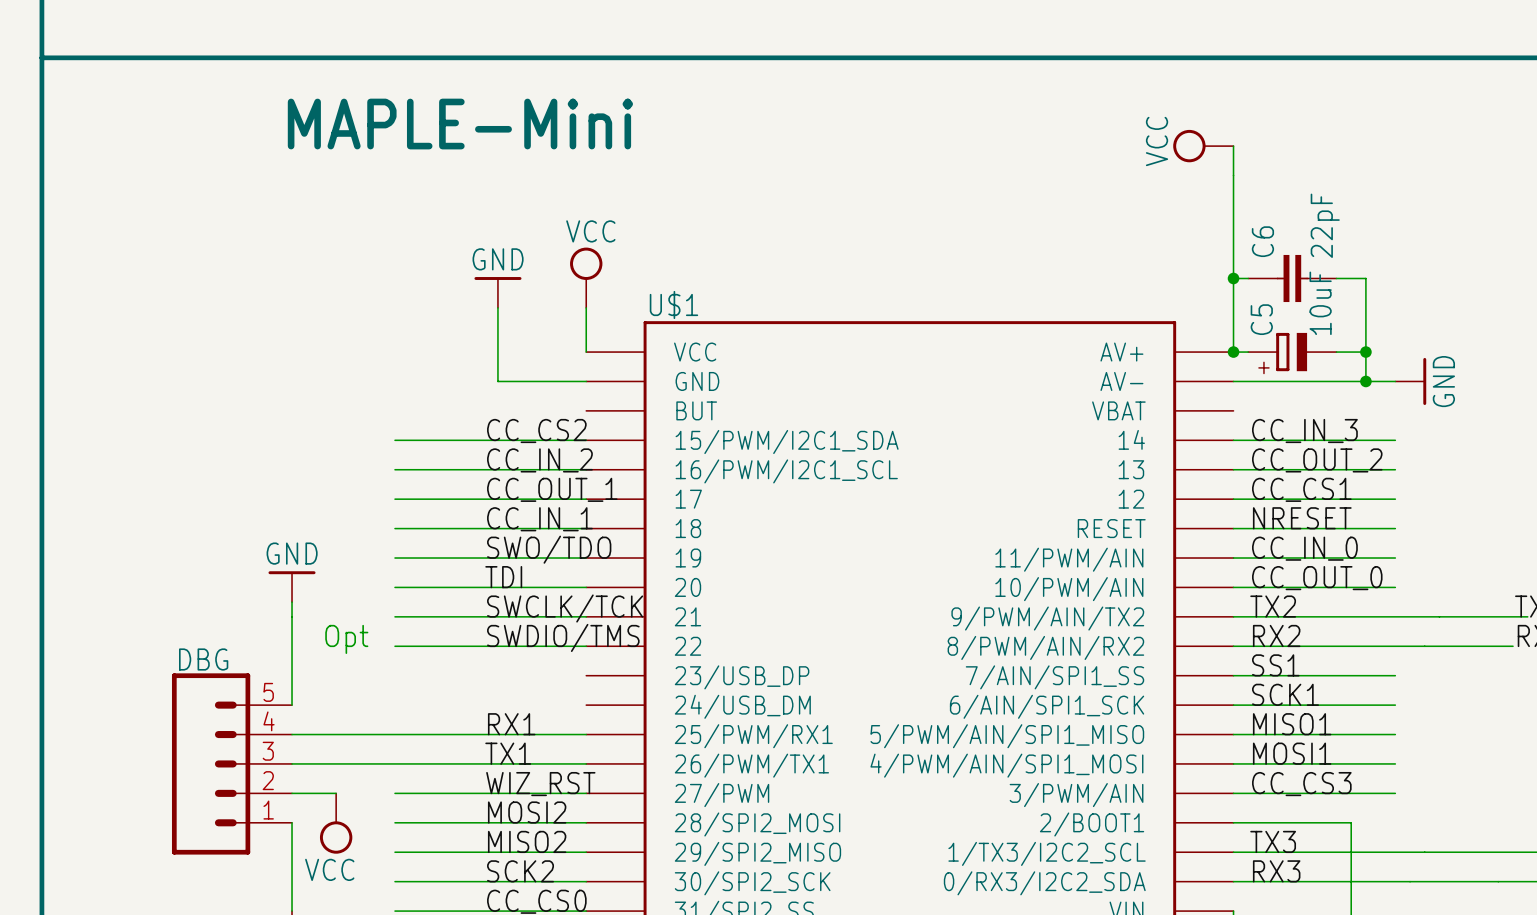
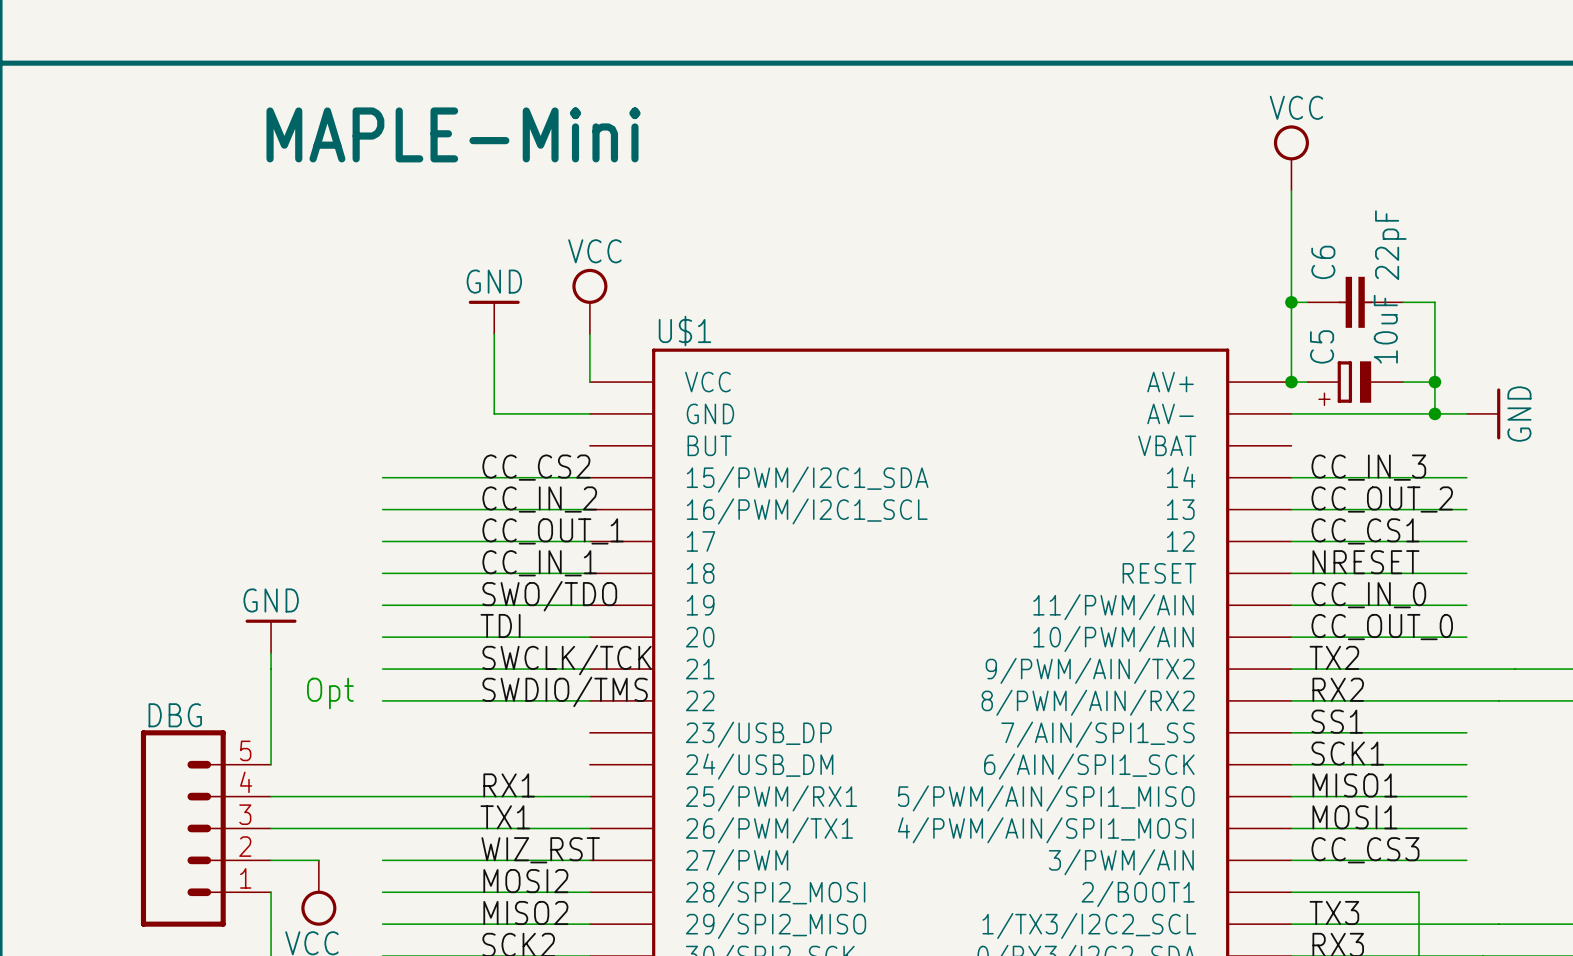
power symbol rotation: 0° (1189, 146) -> 90° clockwise (1291, 142)

